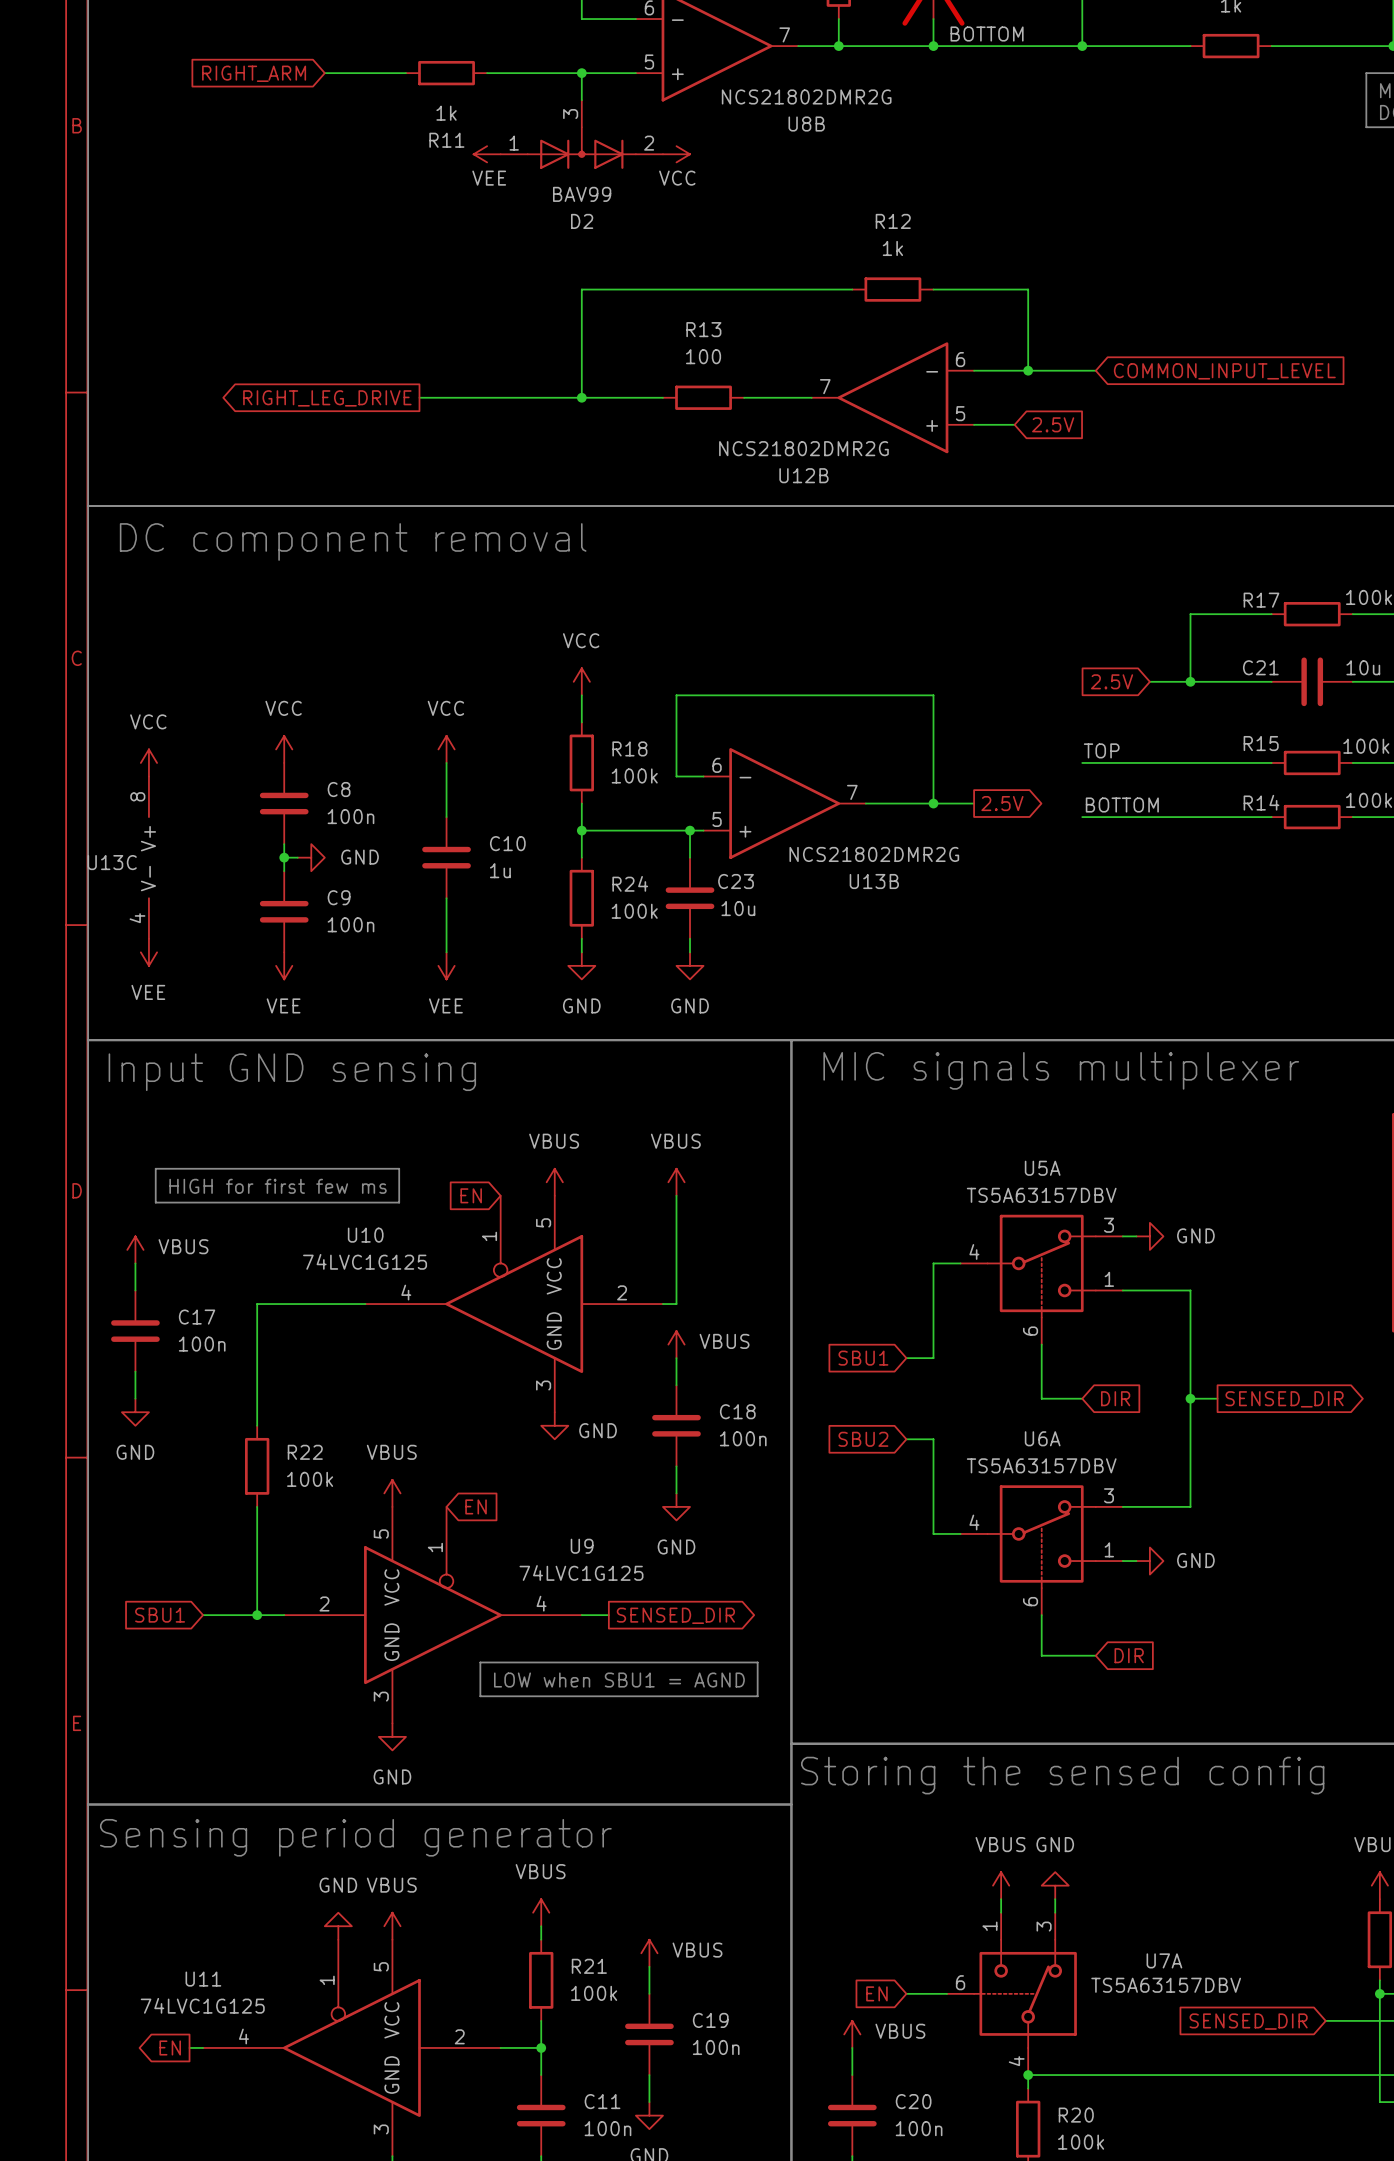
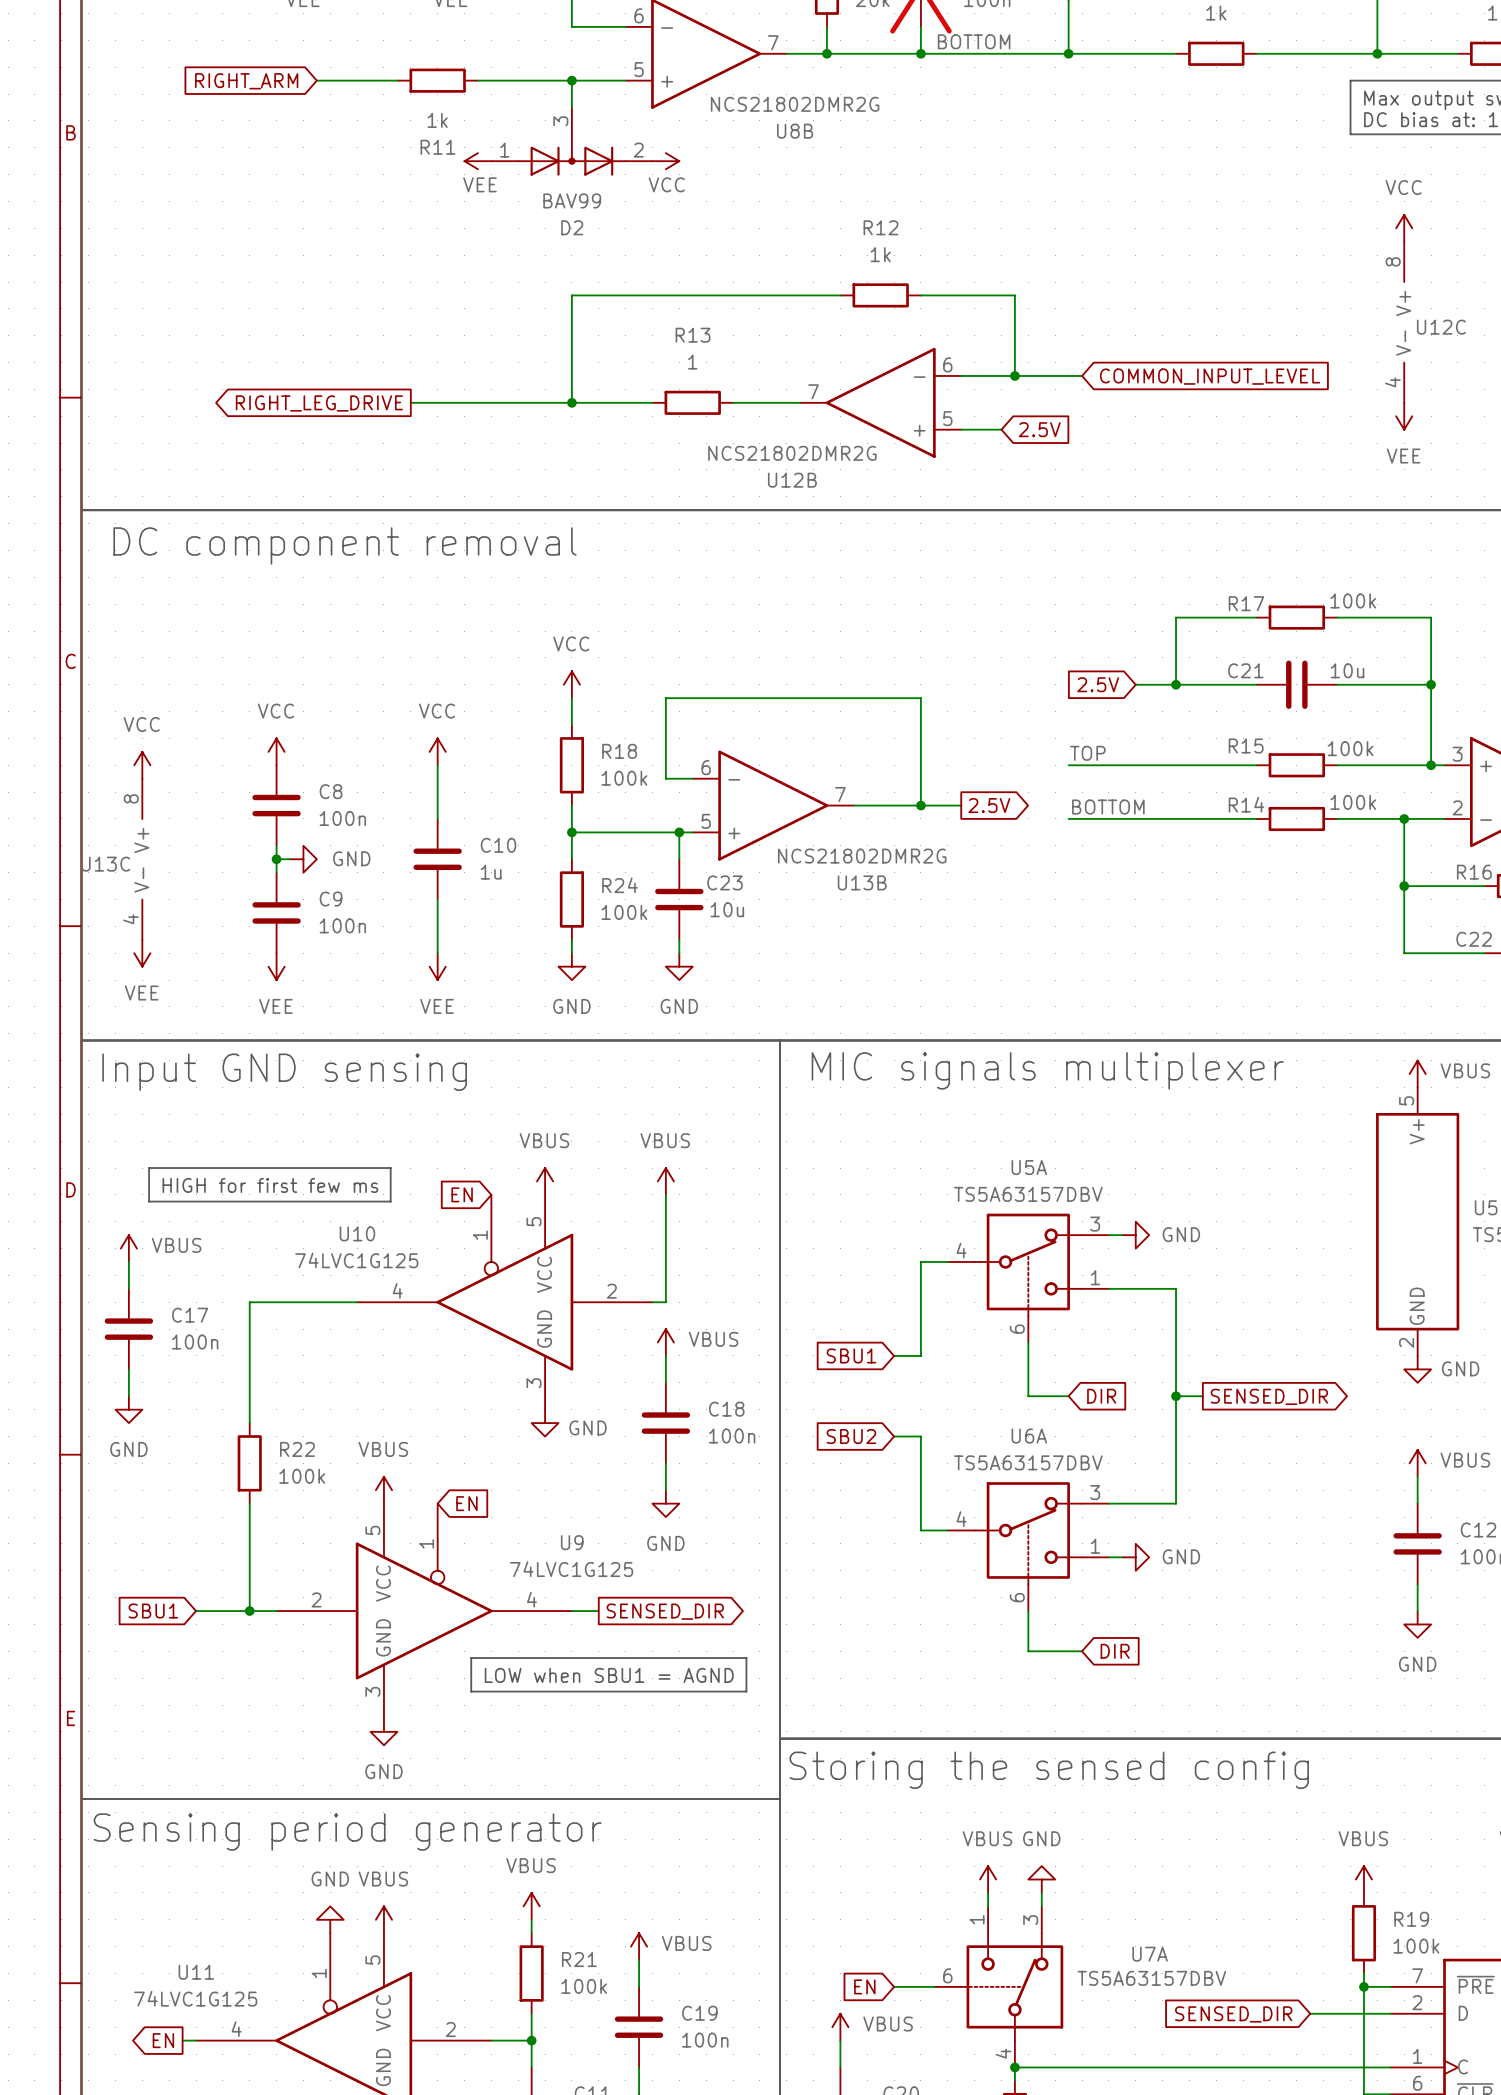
R13 value: 100 (703, 356) -> 1 (692, 362)

